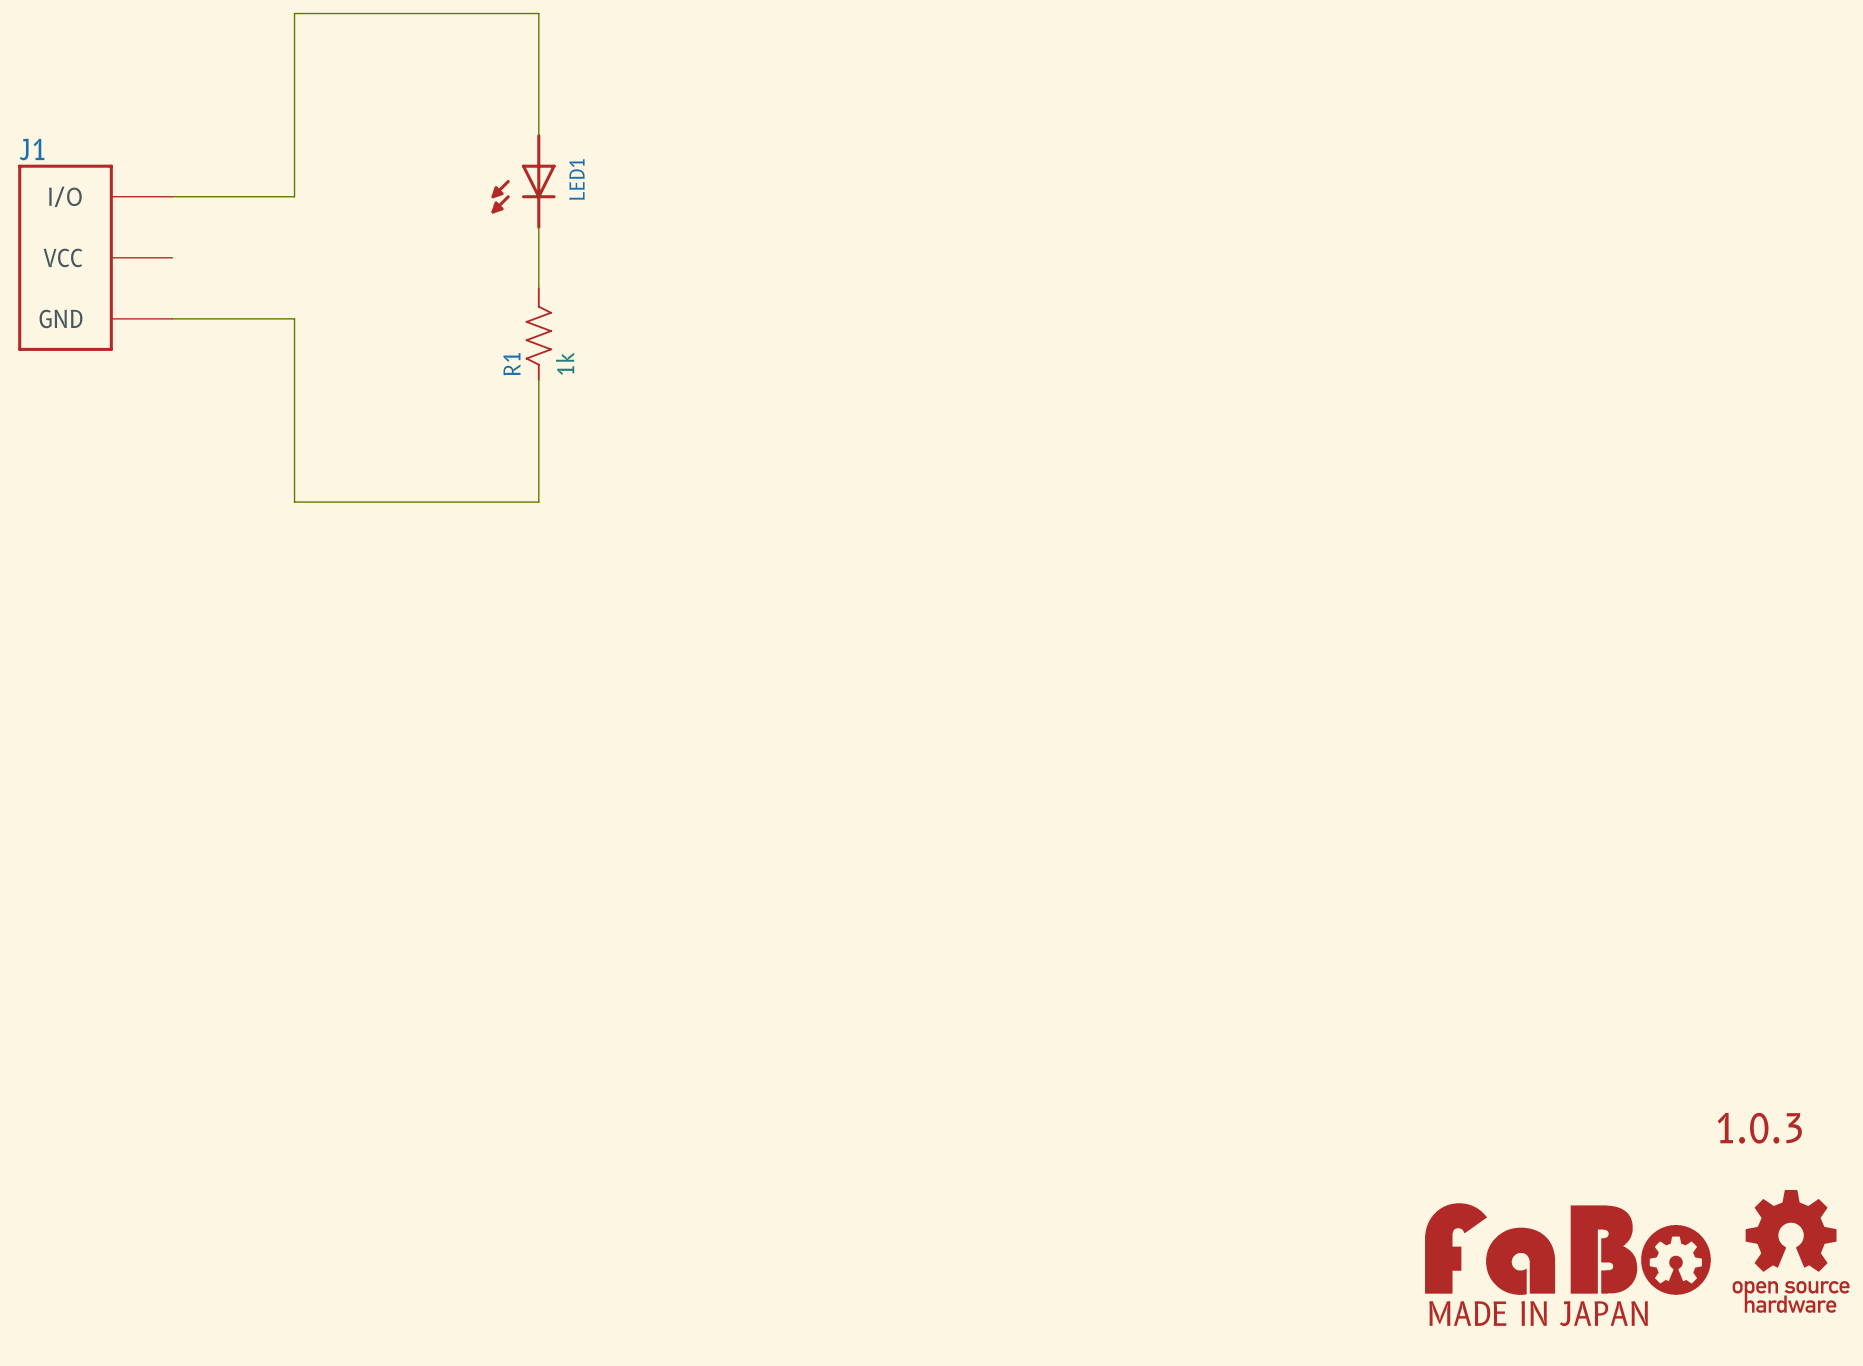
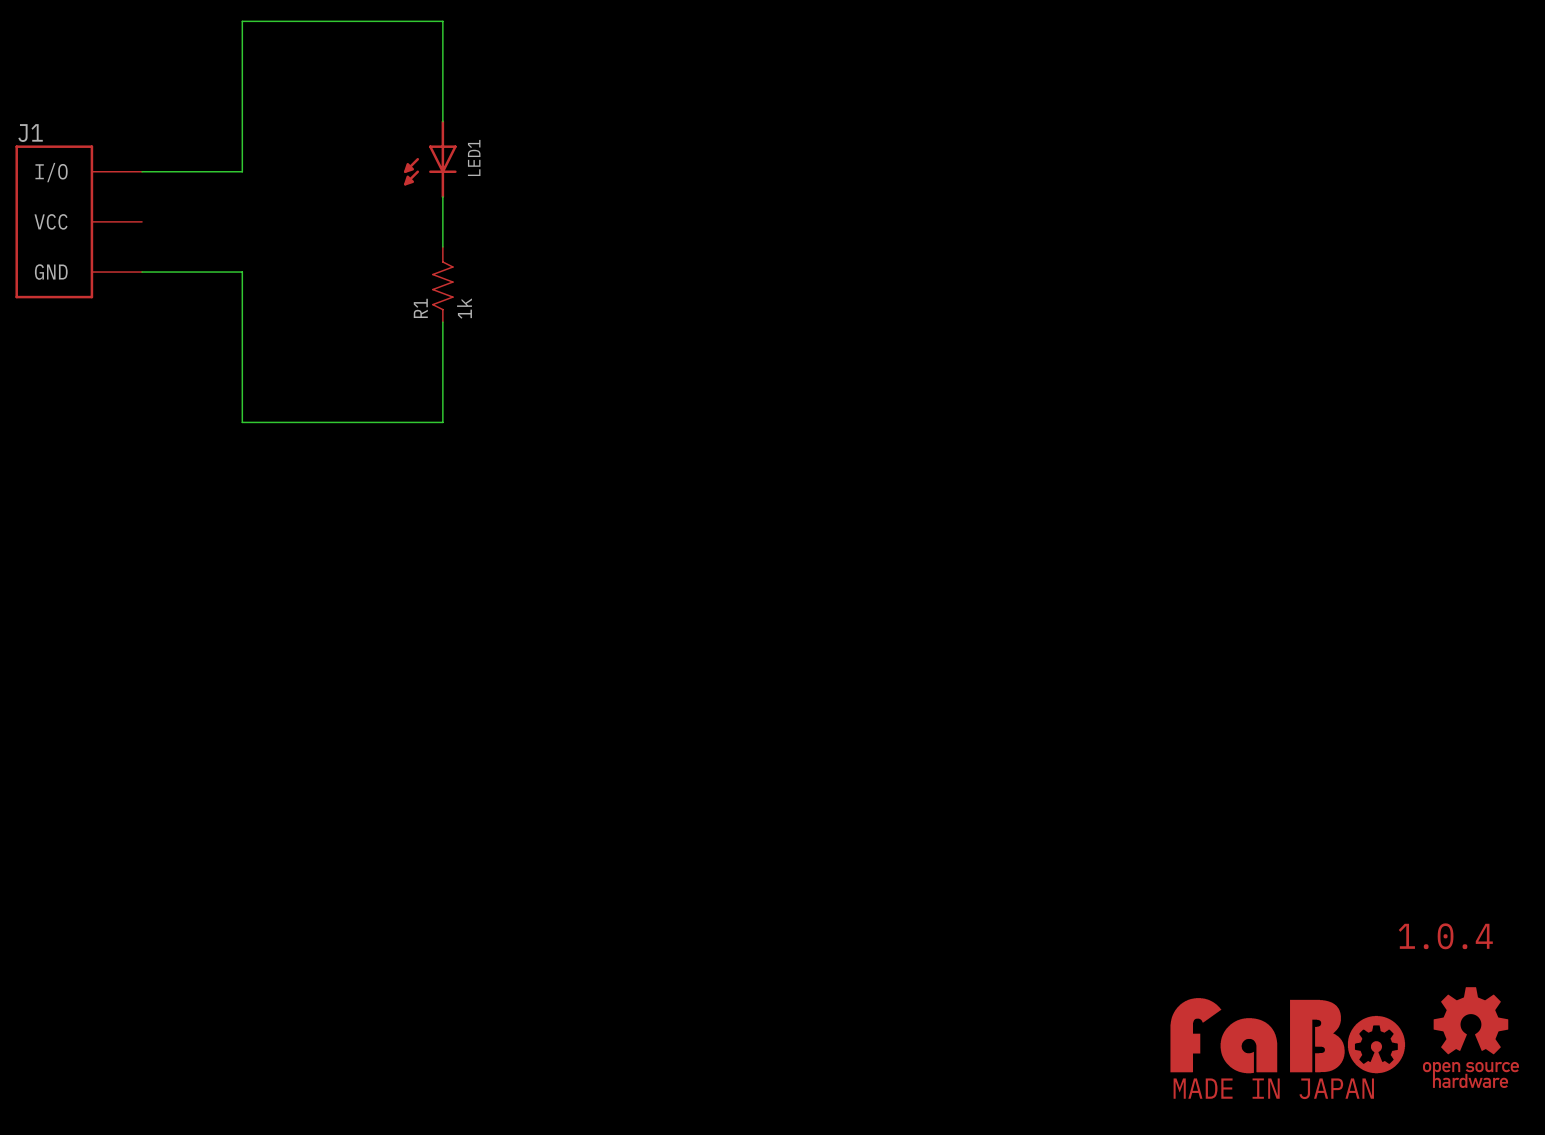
text: 1.0.3 (1759, 1128) -> 1.0.4 (1445, 936)

